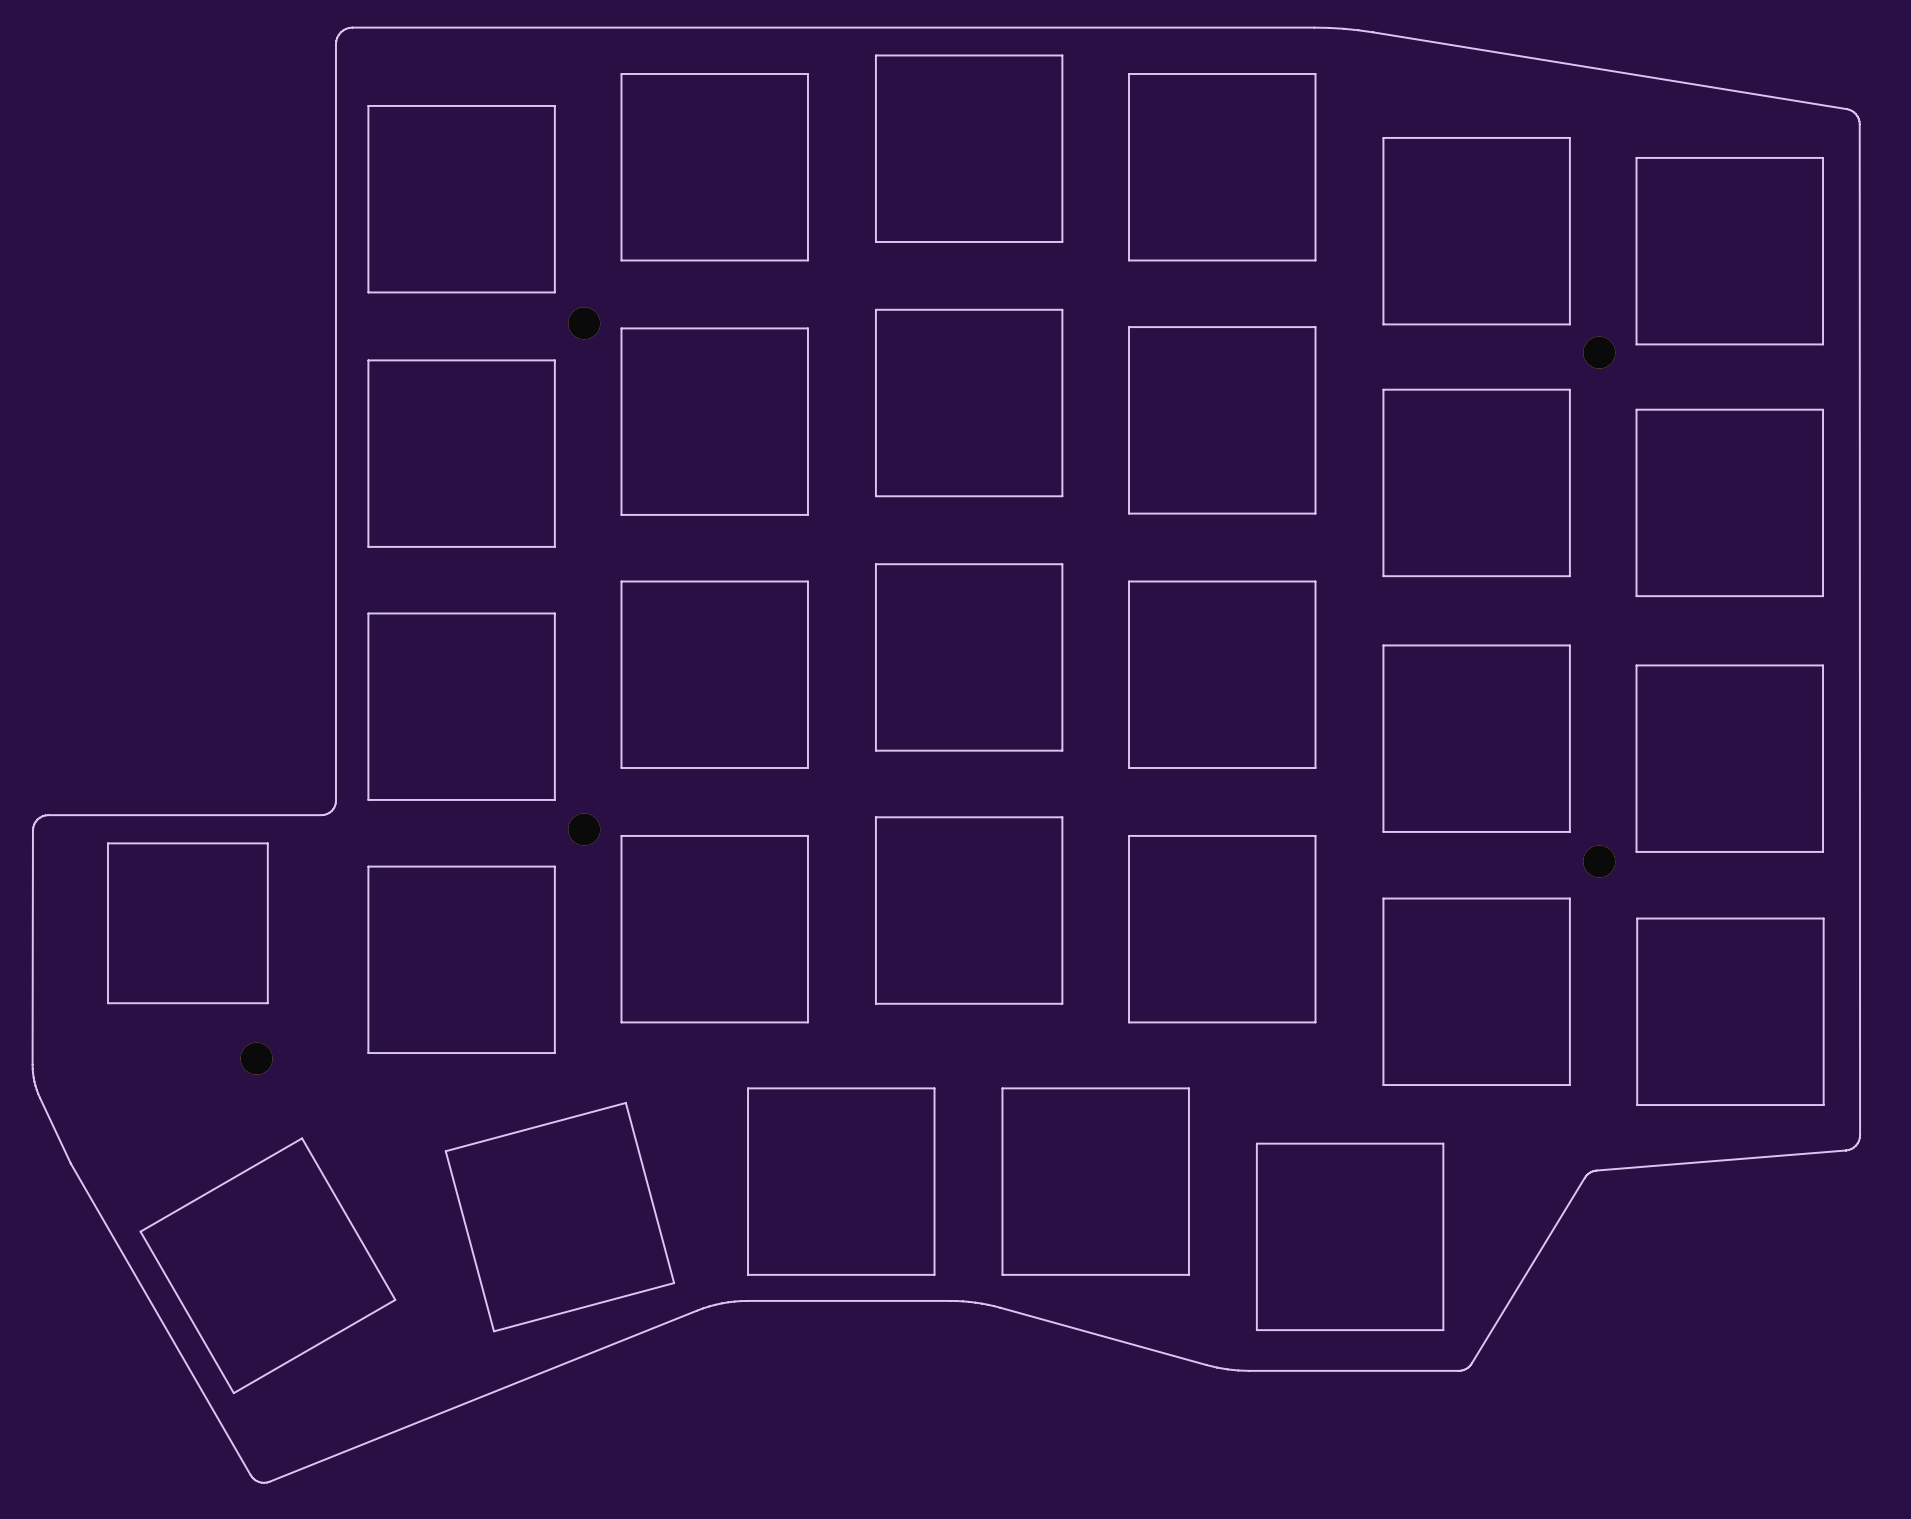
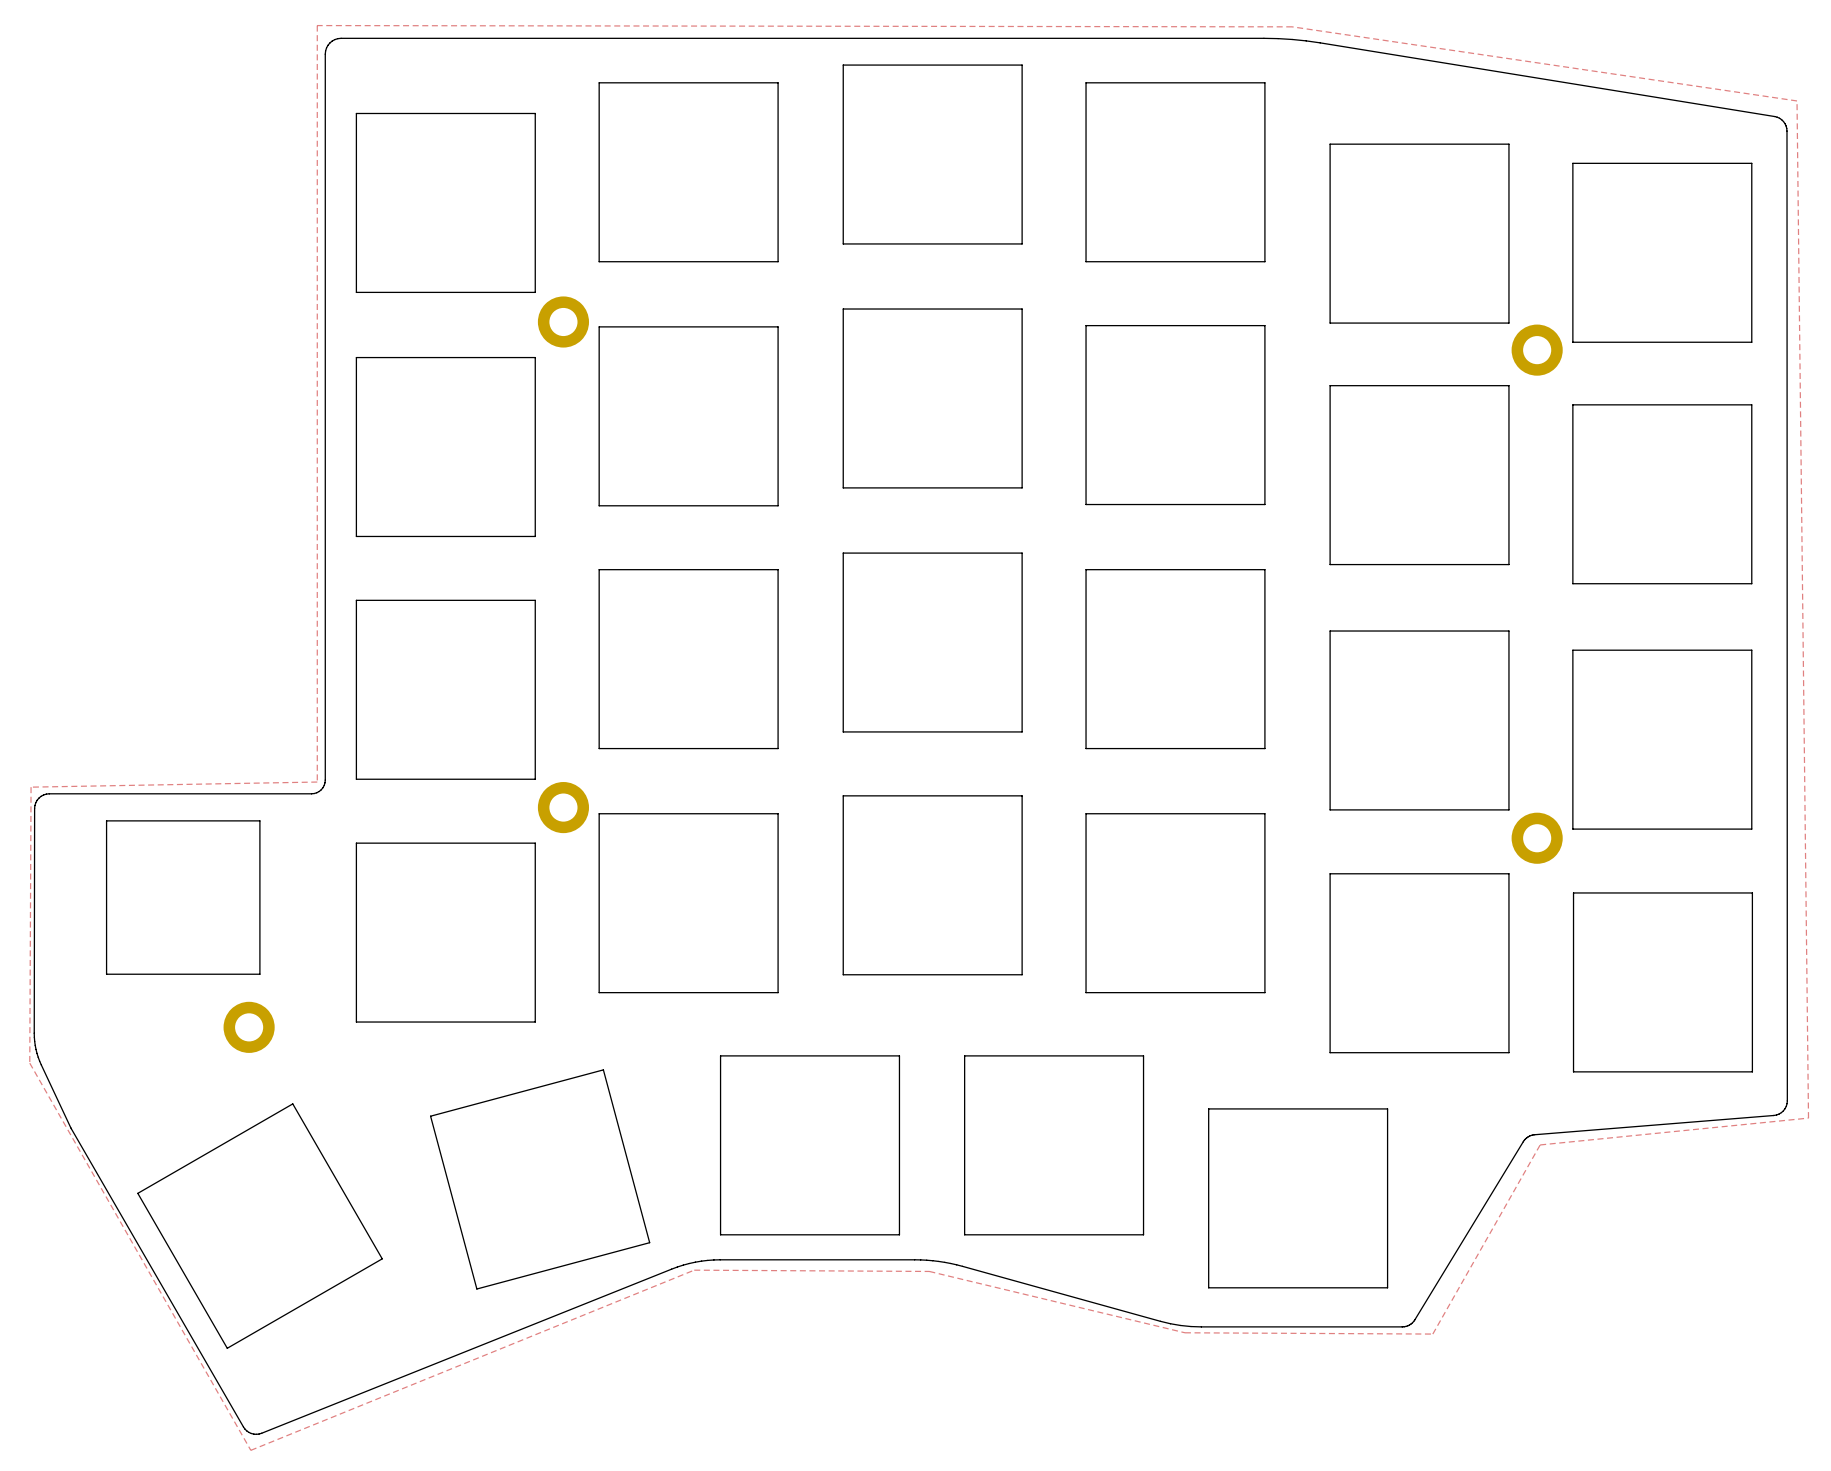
zone outline: none -> (317, 25) (317, 782) (31, 787) (29, 1063) (250, 1450) (694, 1270) (929, 1271) (1184, 1332) (1432, 1334) (1540, 1144) (1808, 1118) (1797, 100) (1292, 26) (317, 25)
part footprint: [568, 307, 601, 340] -> [537, 296, 590, 348]
part footprint: [1583, 336, 1616, 369] -> [1511, 324, 1563, 376]
part footprint: [568, 813, 601, 846] -> [537, 782, 590, 834]
part footprint: [1583, 845, 1616, 878] -> [1511, 812, 1563, 864]
part footprint: [240, 1042, 273, 1075] -> [223, 1001, 275, 1053]

